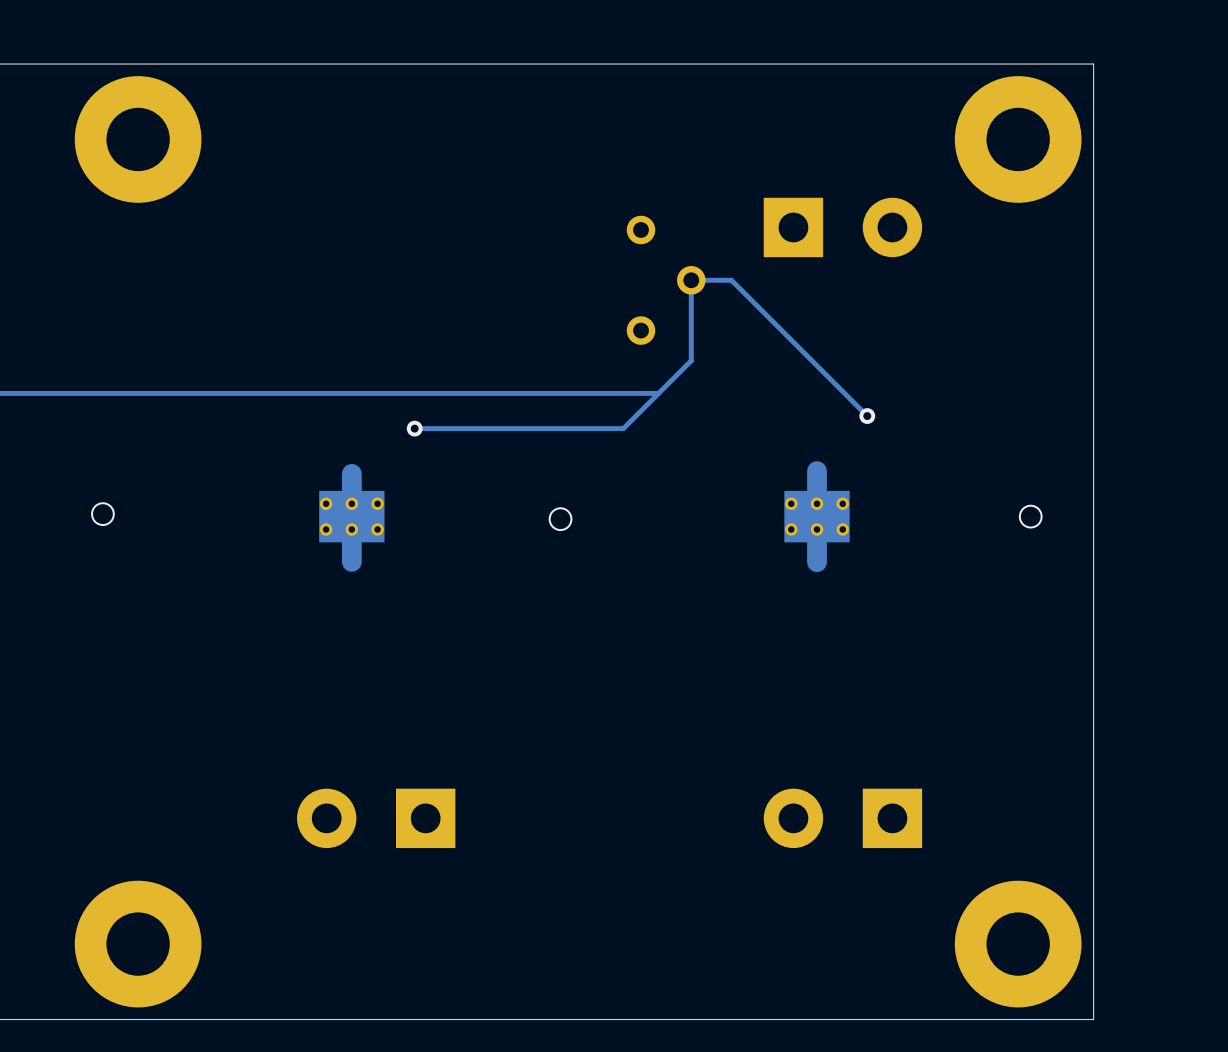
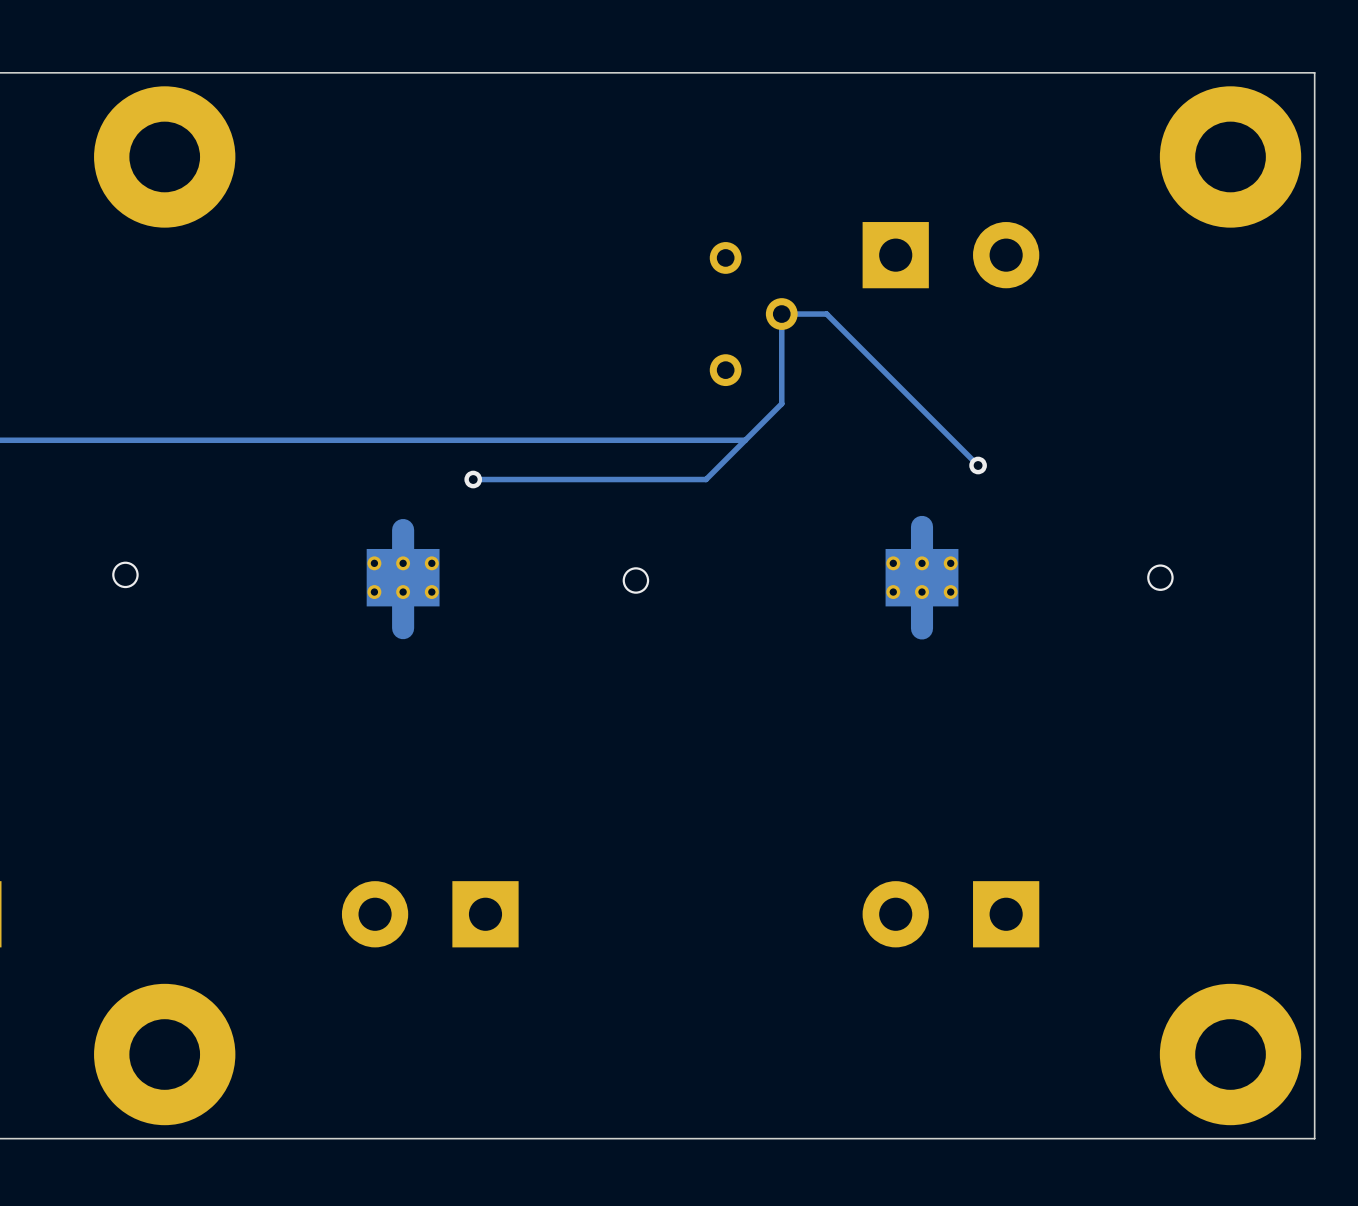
board edge: (1093, 64) (1093, 1019) -> (1230, 72) (1314, 72) (1314, 1138) (1230, 1138)
part position: (1018, 139) -> (1230, 156)
part position: (1018, 944) -> (1230, 1054)

